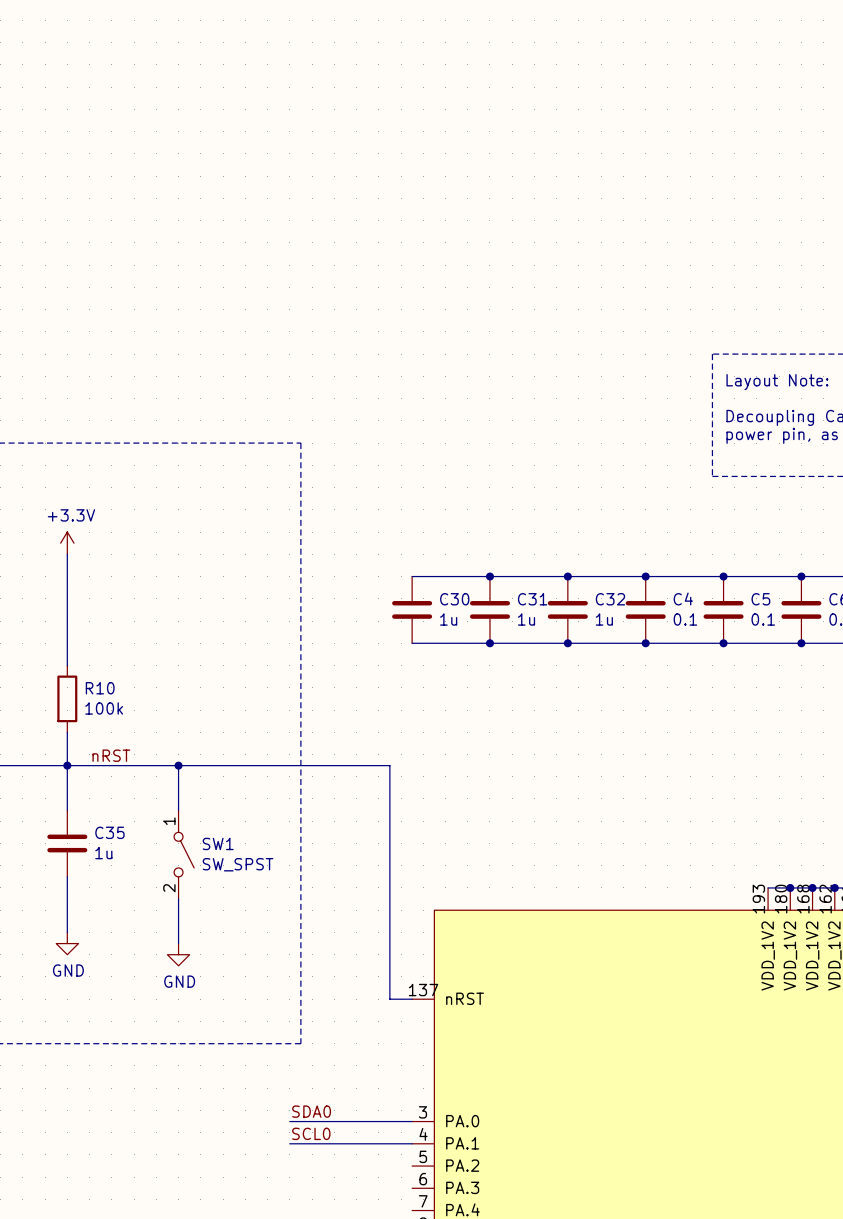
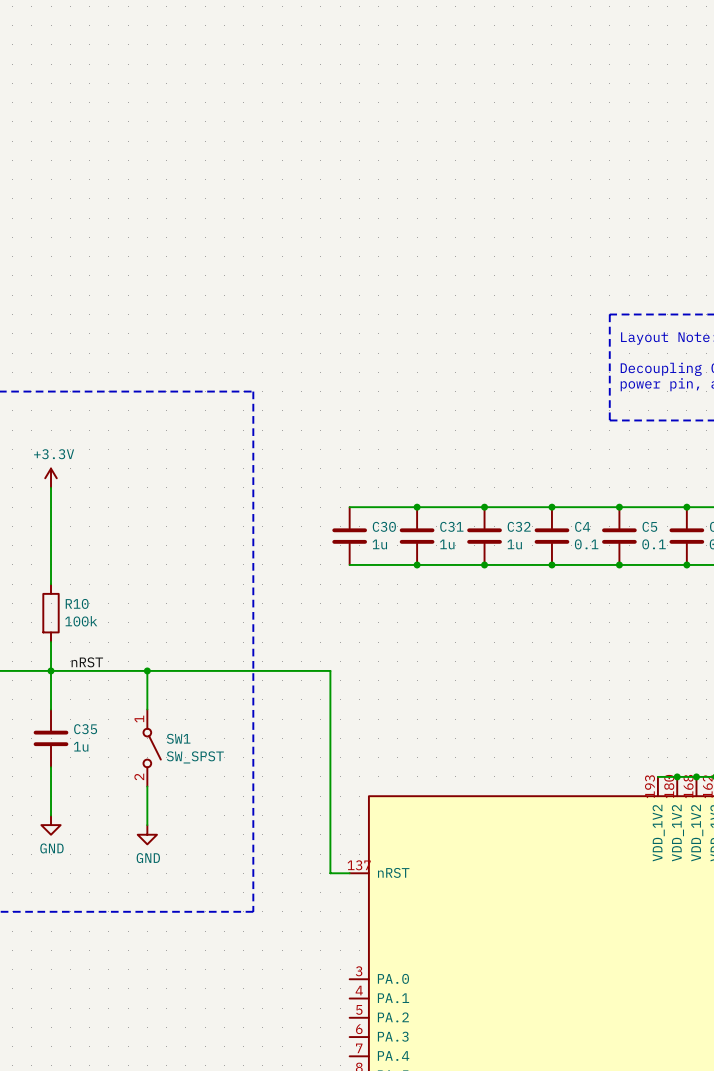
label: SDA0 (311, 1111) -> none
wire: (289, 1121) (412, 1121) -> none
label: SCL0 (311, 1133) -> none
wire: (289, 1143) (412, 1143) -> none

